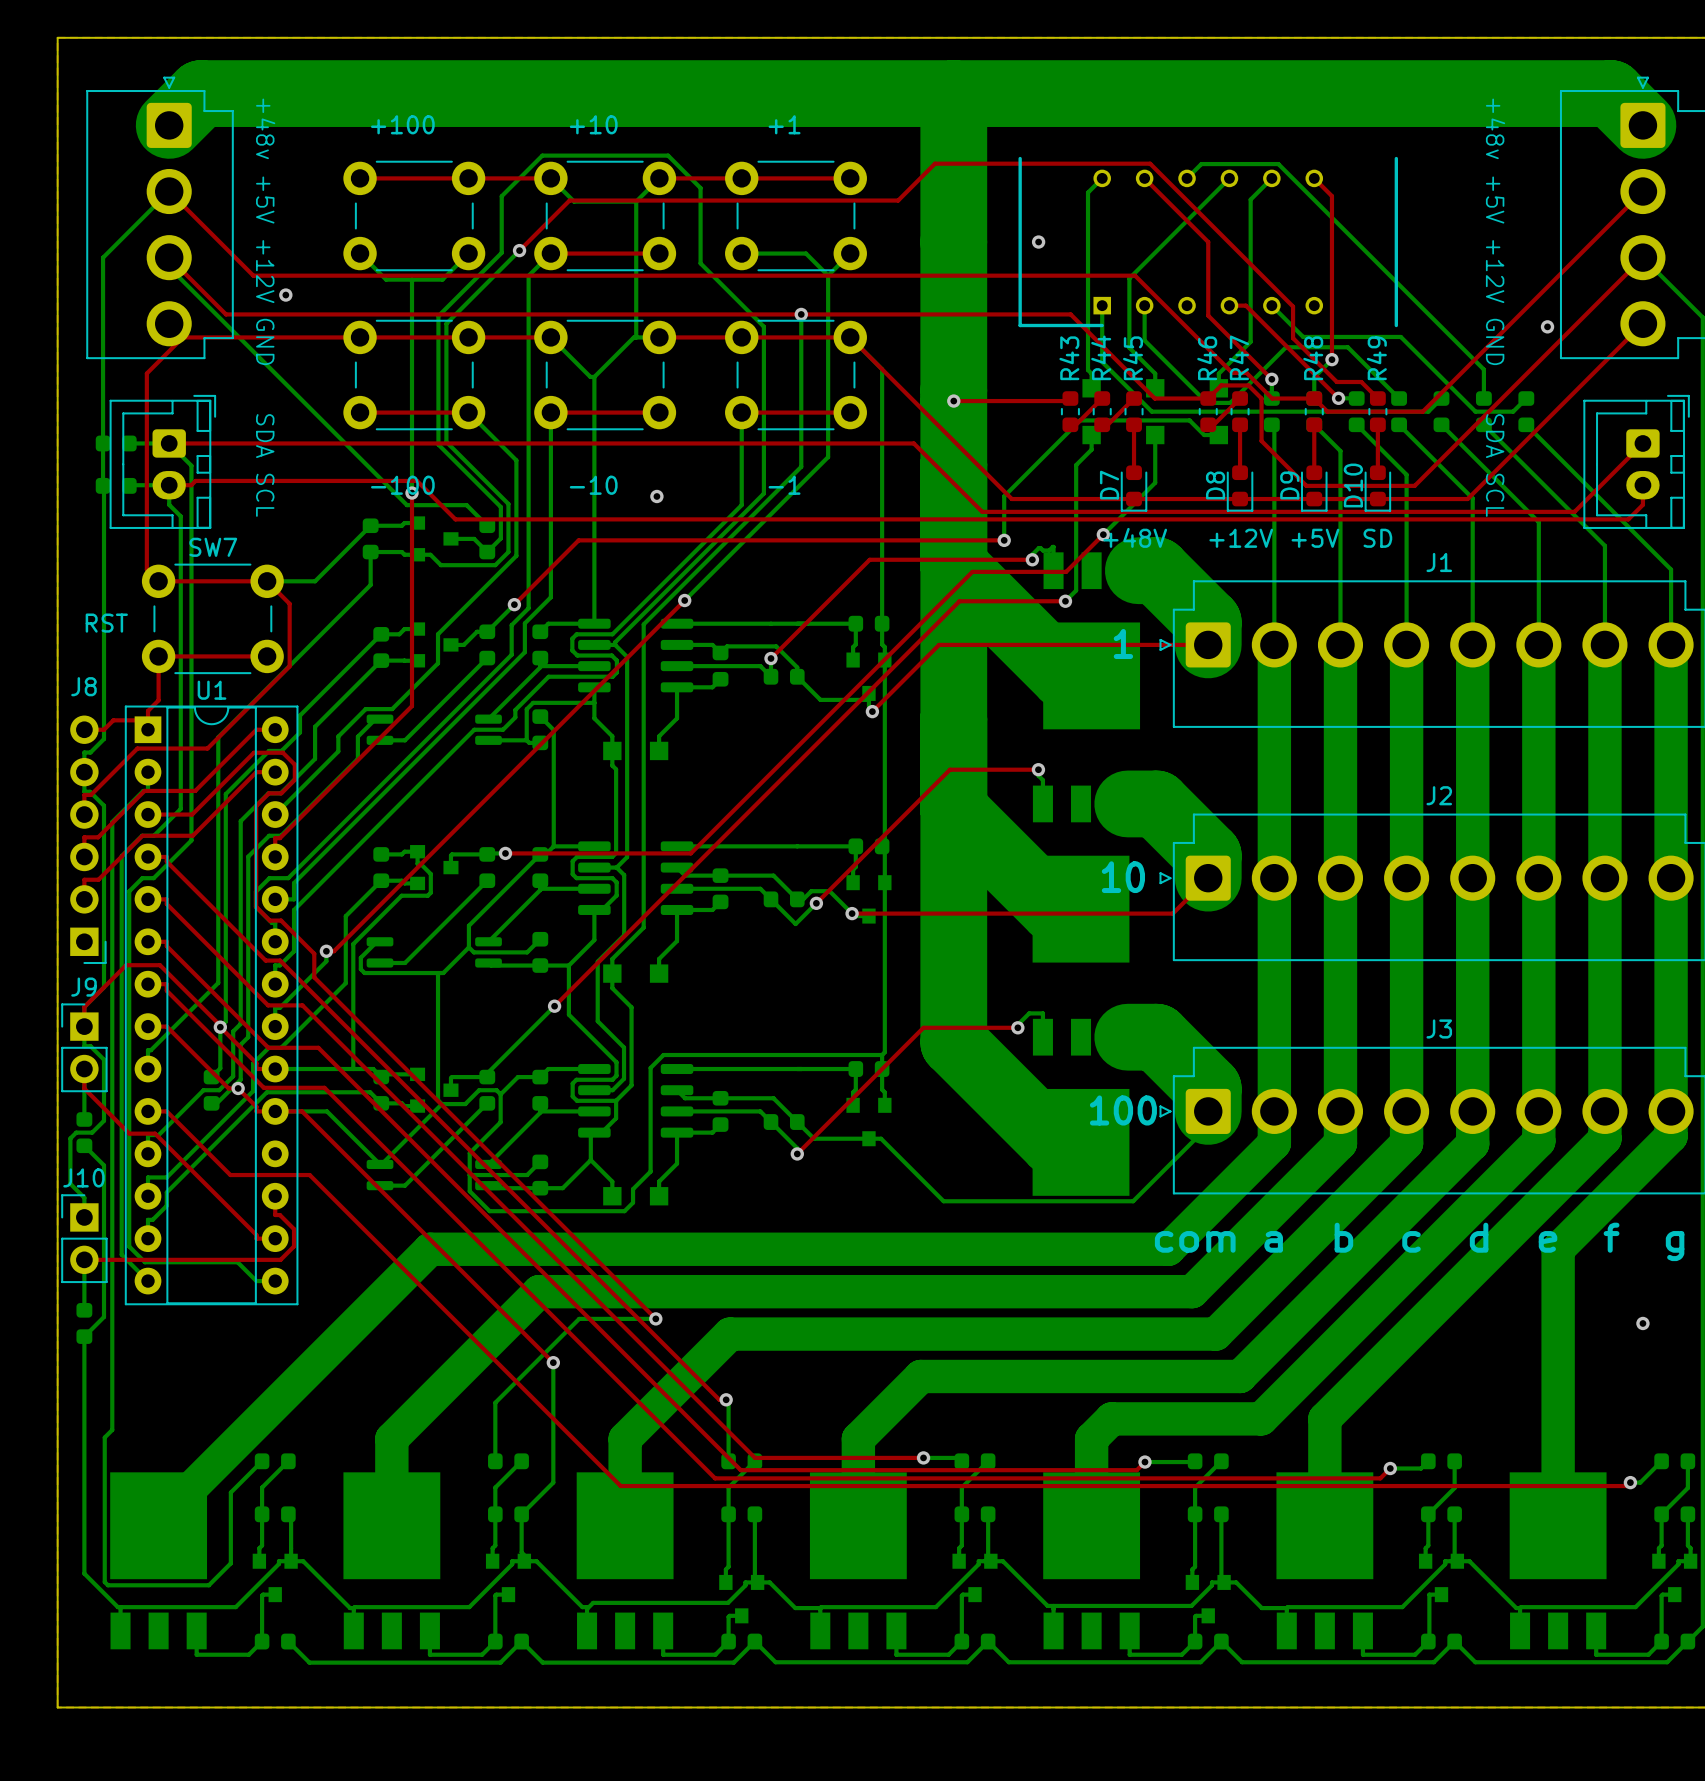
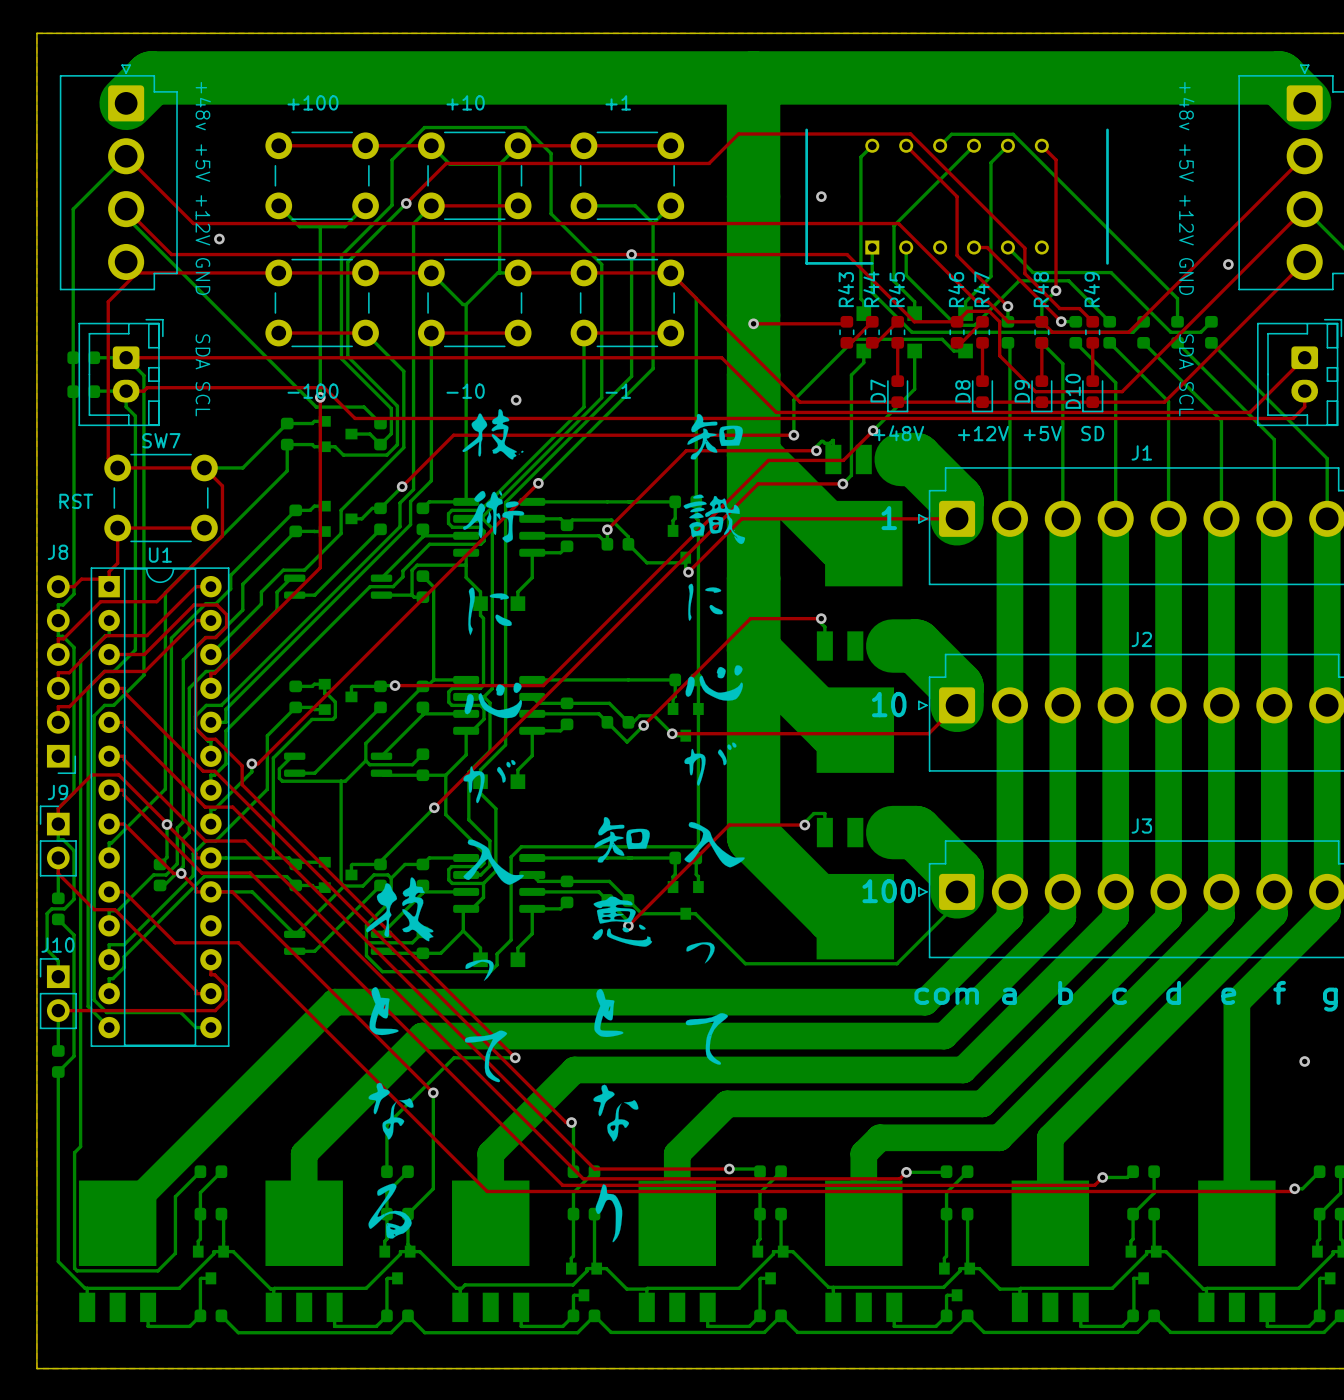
drawing: none -> [366, 409, 746, 1243]

